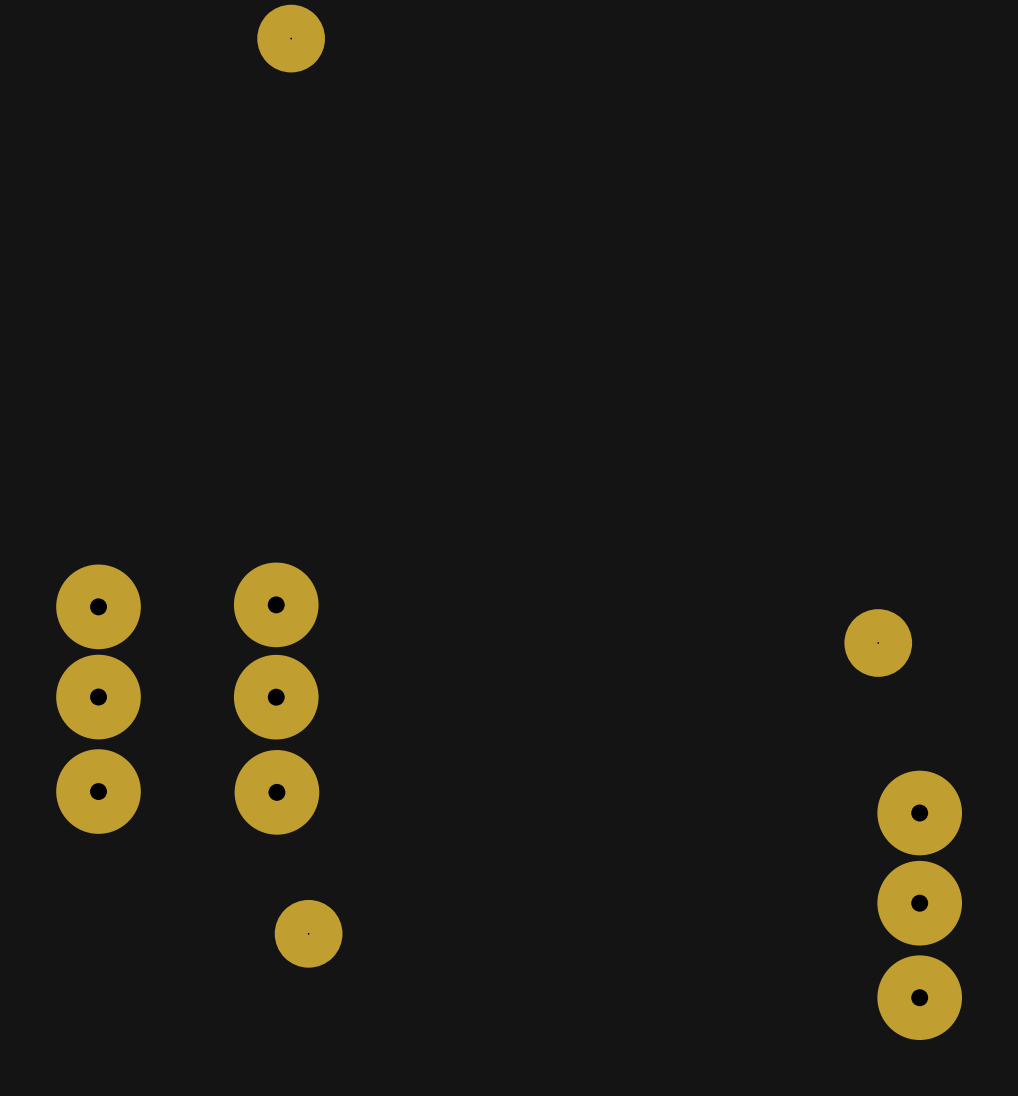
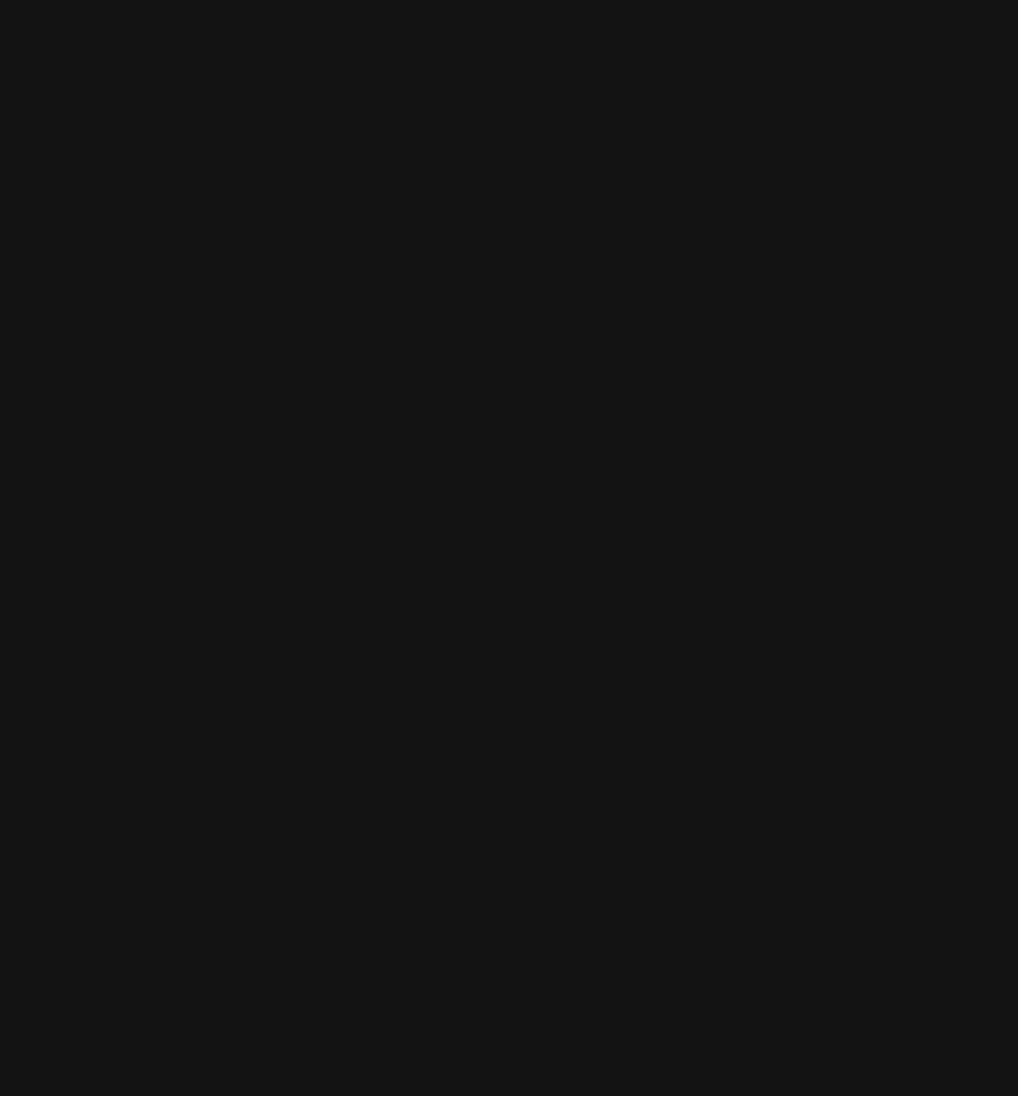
via: (291, 38) -> none
via: (276, 604) -> none
via: (98, 606) -> none
via: (878, 643) -> none
via: (98, 697) -> none
via: (276, 697) -> none
via: (98, 791) -> none
via: (276, 792) -> none
via: (919, 813) -> none
via: (919, 903) -> none
via: (308, 933) -> none
via: (919, 997) -> none

